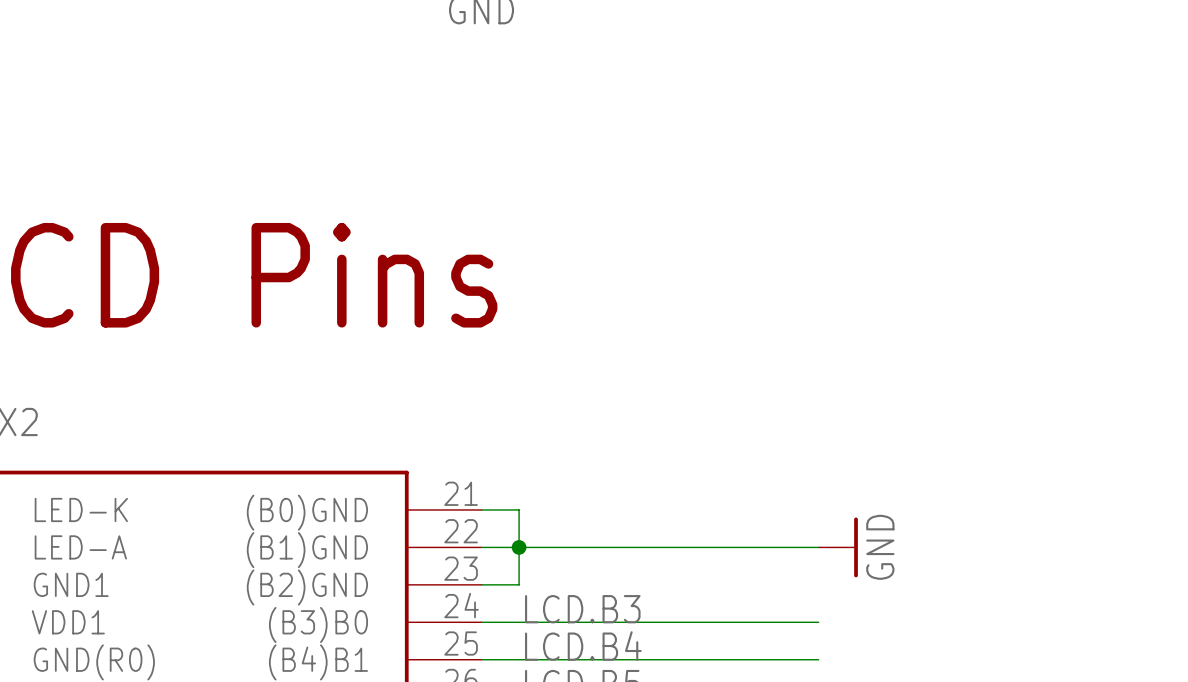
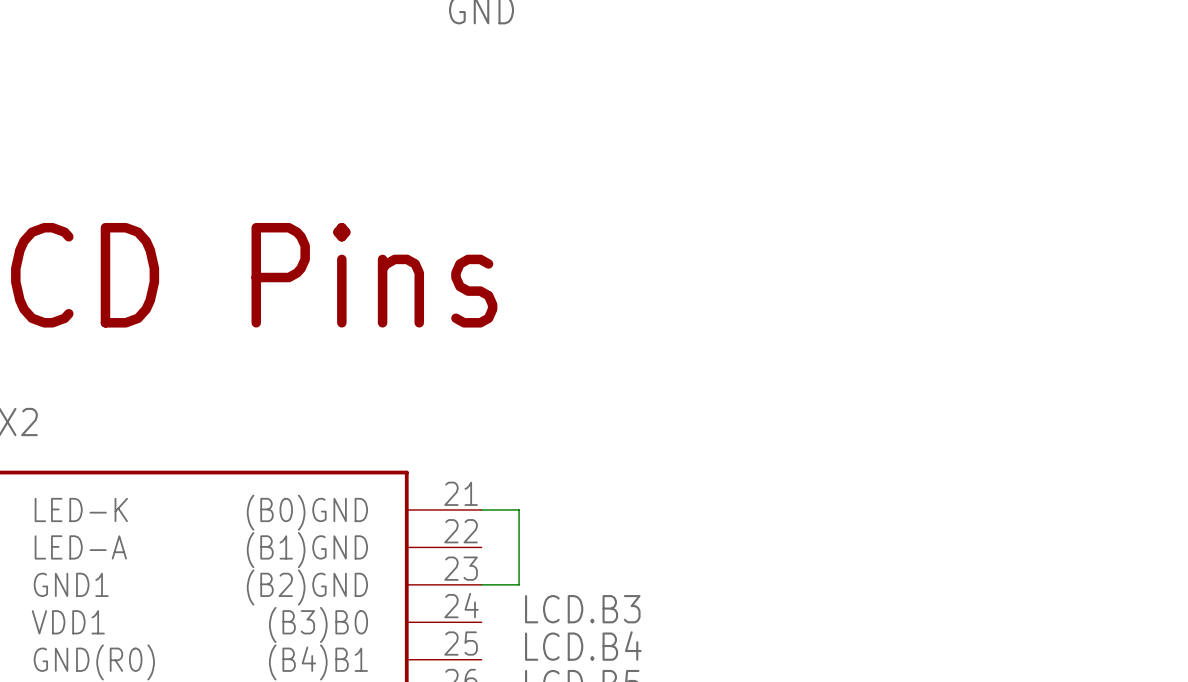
wire: (481, 547) (818, 547) -> none
junction: (519, 547) -> none
power symbol: GND (838, 547) -> none
wire: (481, 622) (818, 622) -> none
wire: (481, 659) (818, 659) -> none

